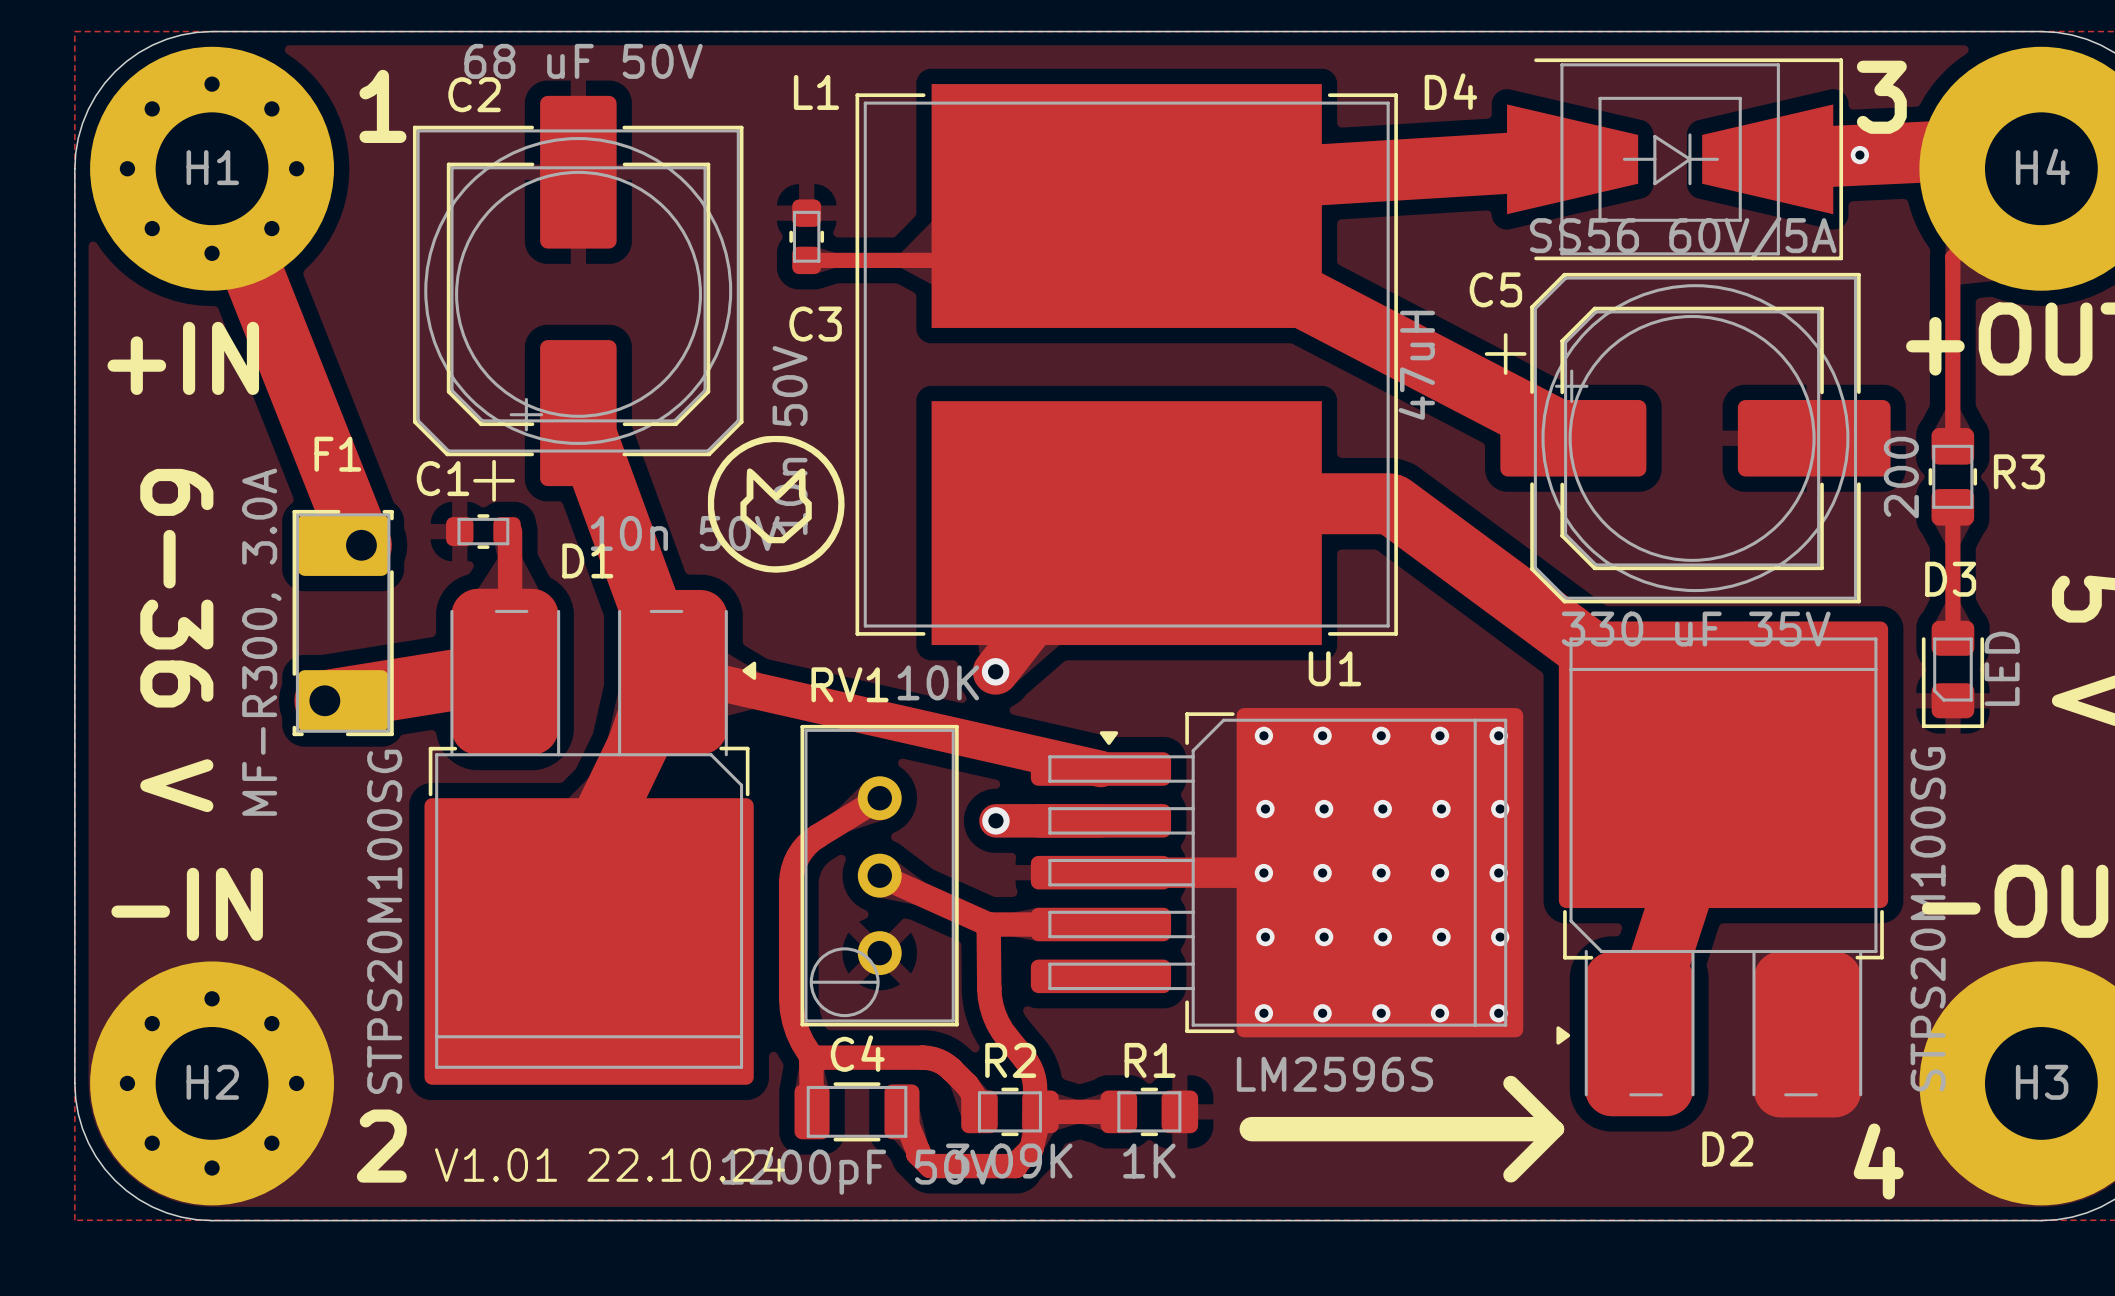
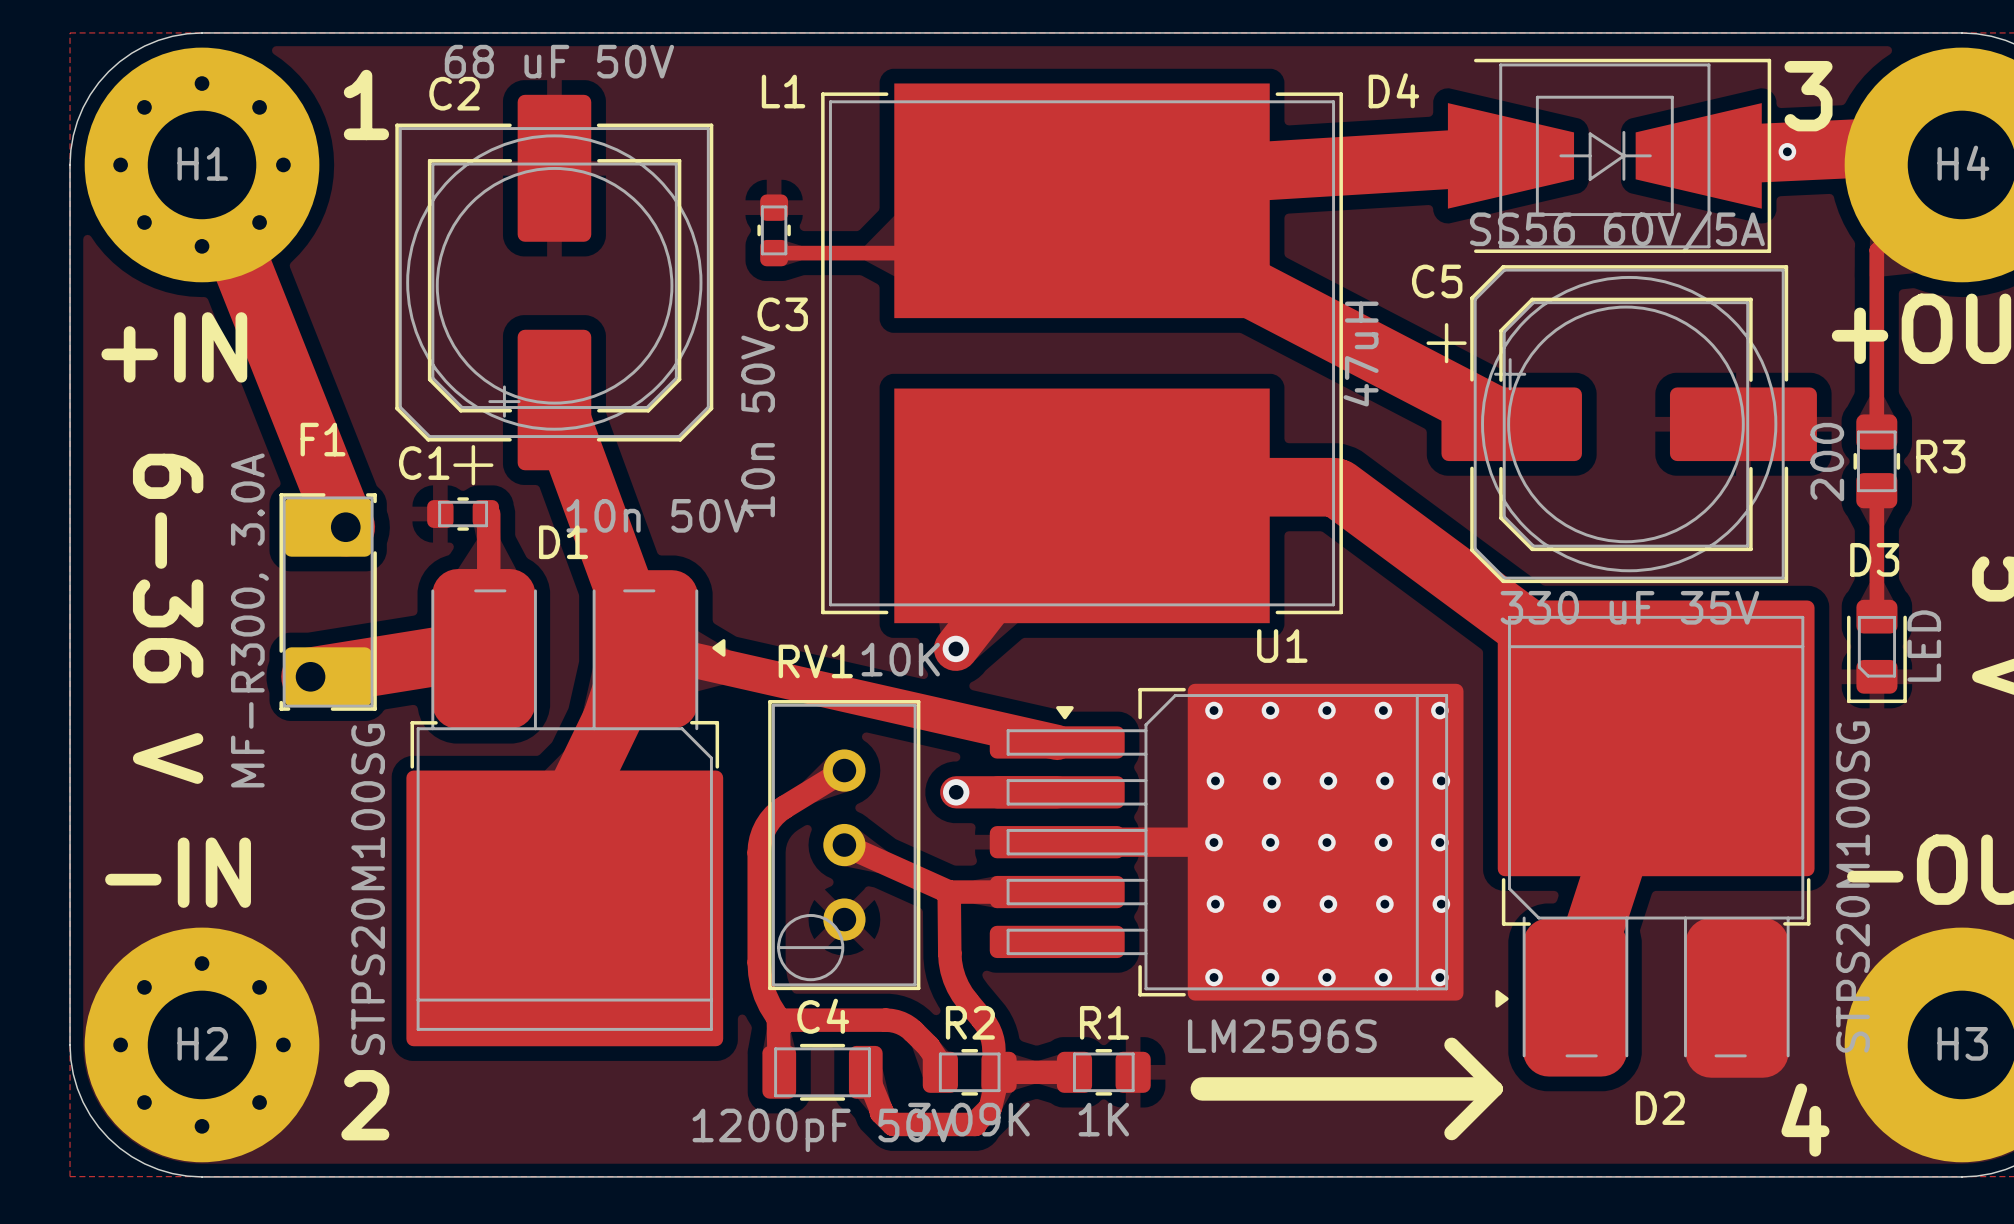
drawing: [707, 435, 845, 573] -> none
text: V1.01 22.10.24 (609, 1164) -> none

